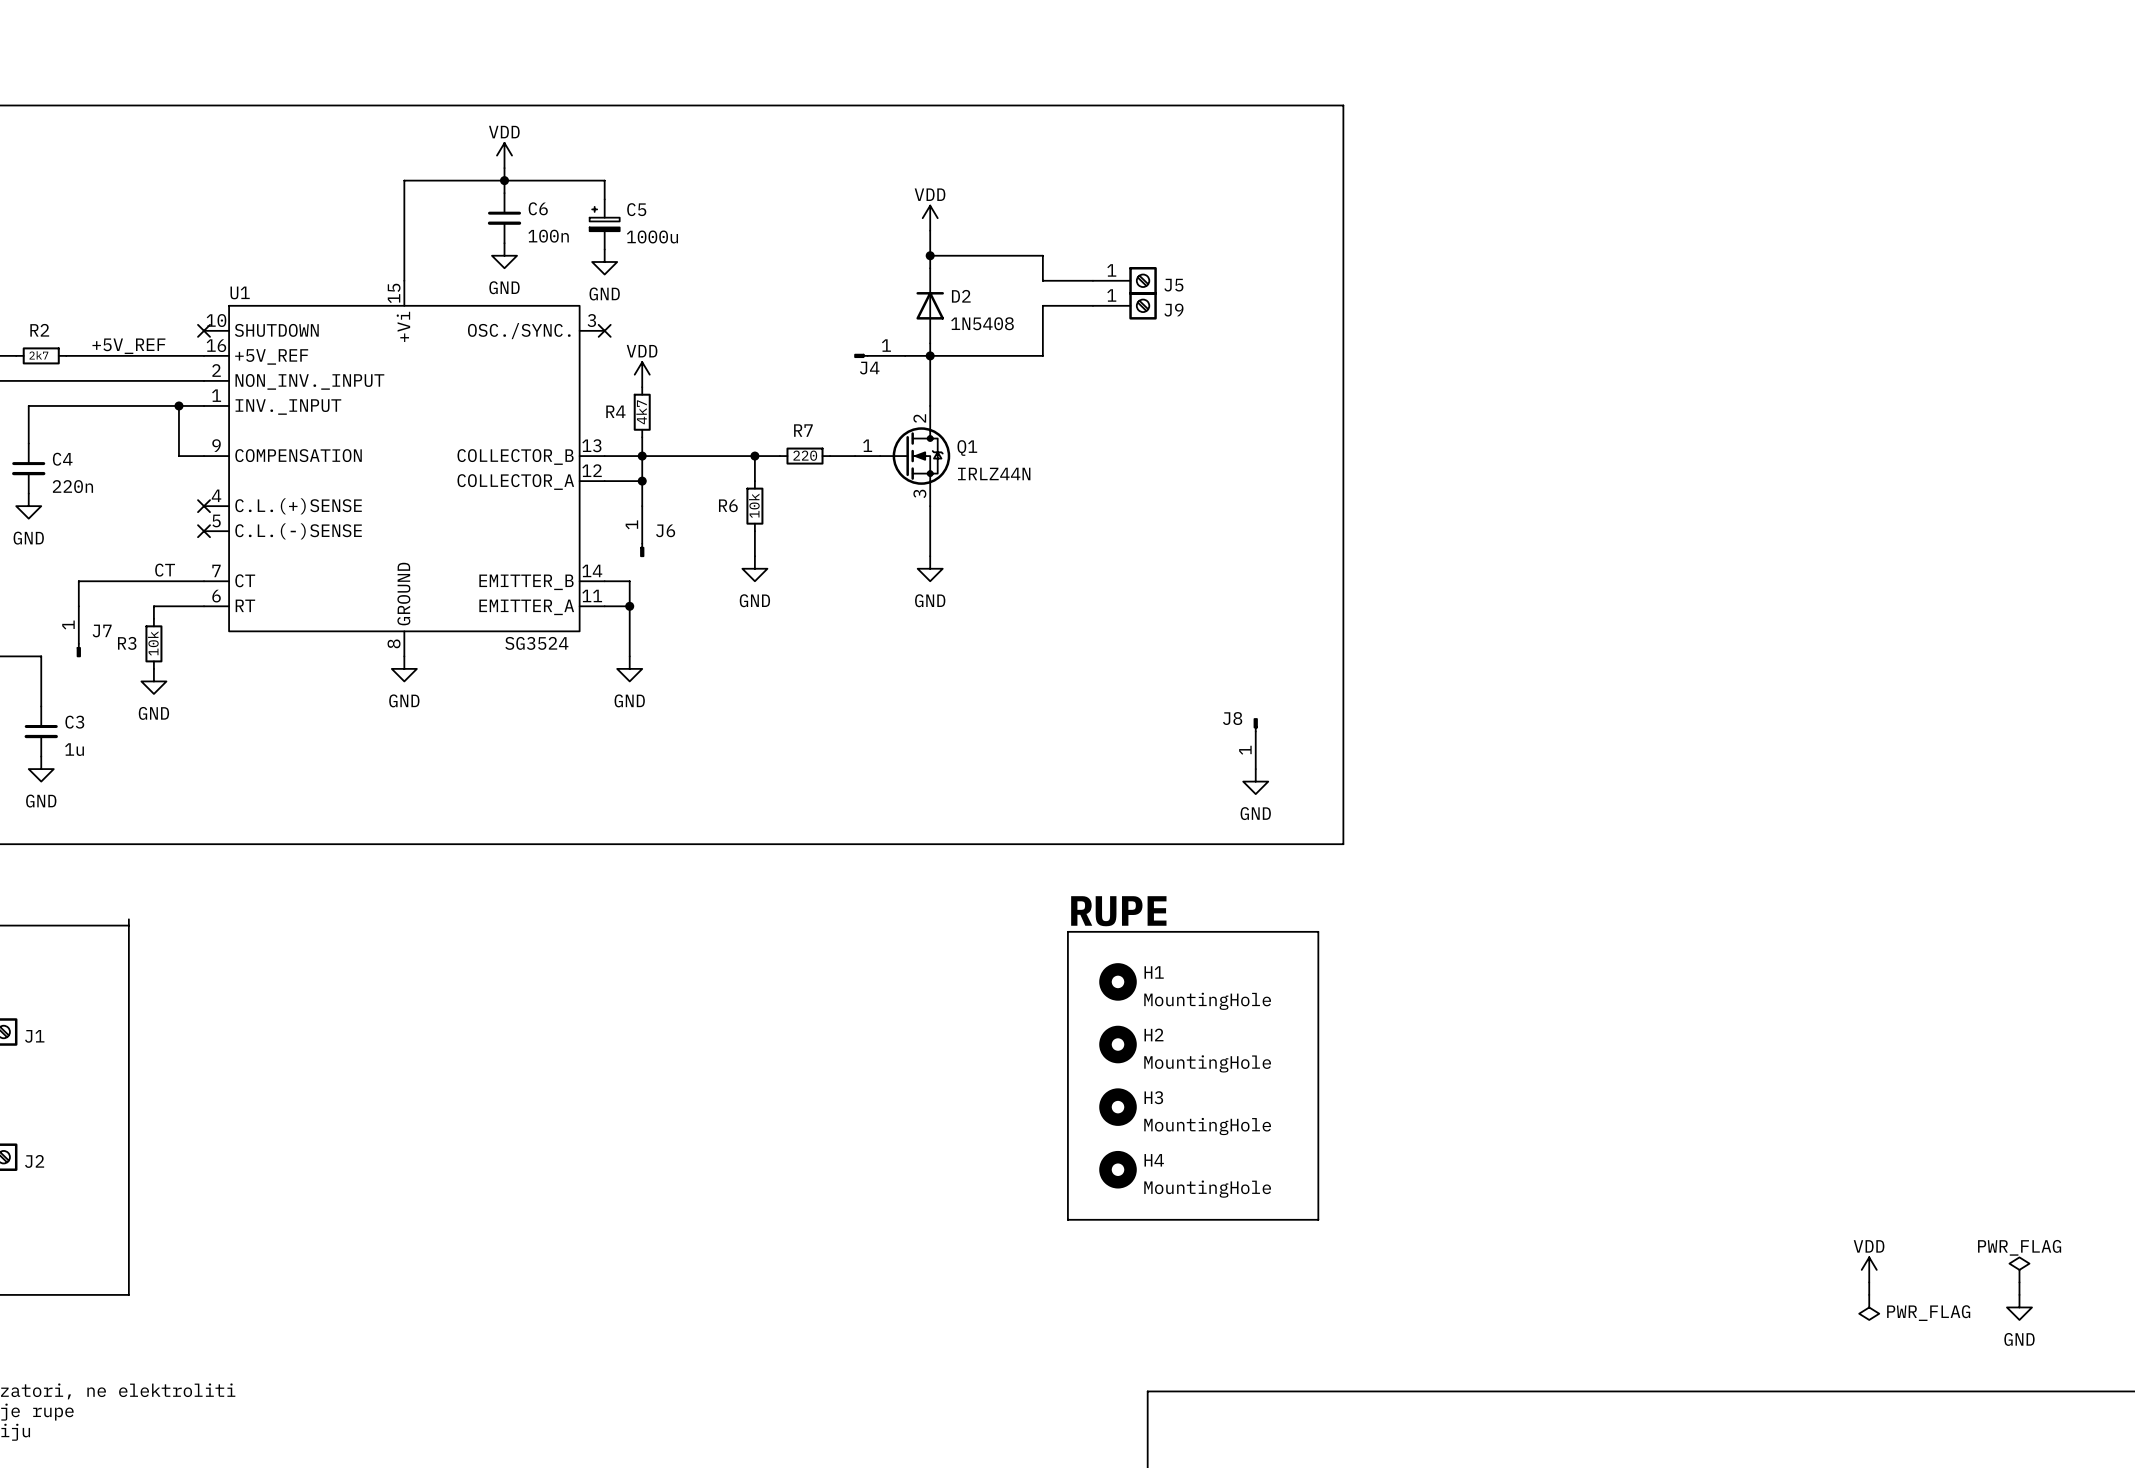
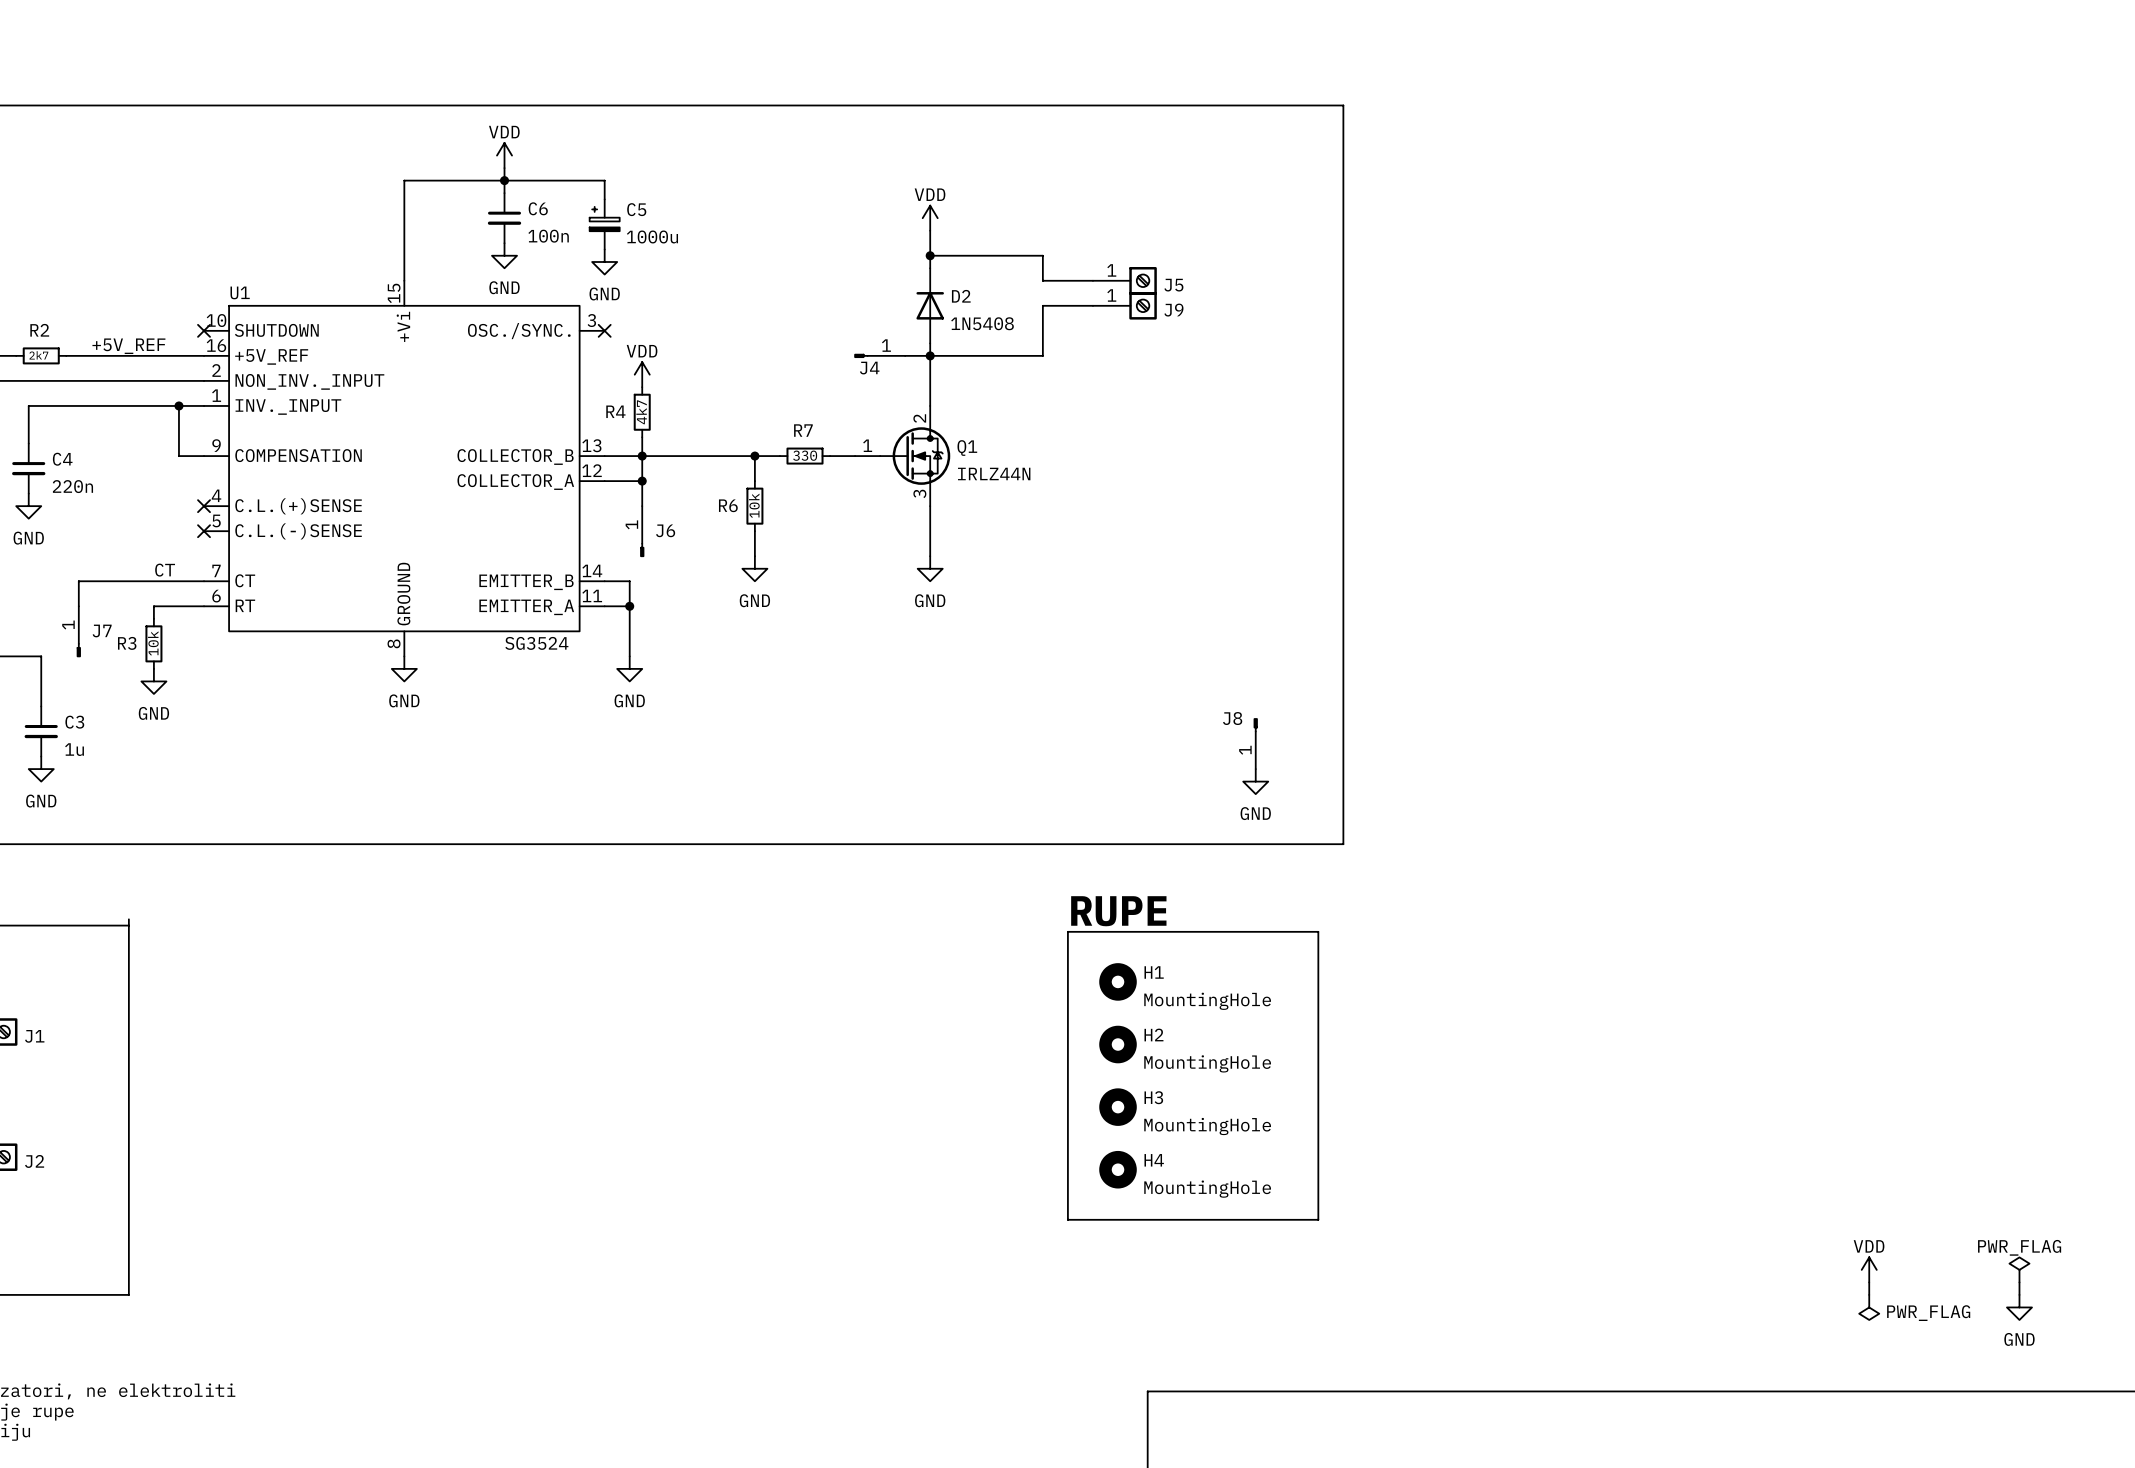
R7 value: 220 (805, 455) -> 330 (805, 455)

